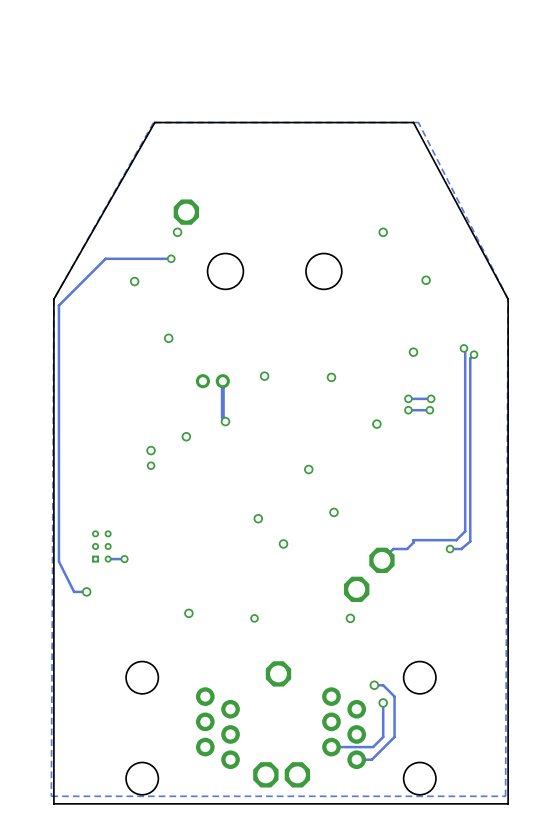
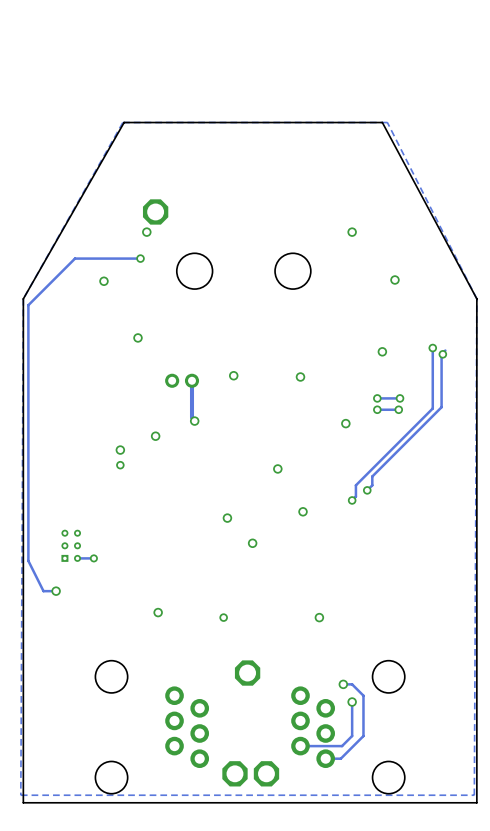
track: (463, 348) (465, 531) (456, 540) (413, 540) (407, 549) (393, 549) (381, 560) -> (432, 348) (432, 408) (355, 485) (355, 496) (352, 500)
track: none -> (445, 350) (441, 354) (441, 407) (372, 476) (372, 485) (367, 490)
track: (474, 354) (470, 358) (470, 541) (461, 549) (450, 549) -> none
via: none -> (367, 490)
via: none -> (352, 500)
via: (450, 549) -> none
part: (381, 560) -> none
part: (356, 589) -> none

